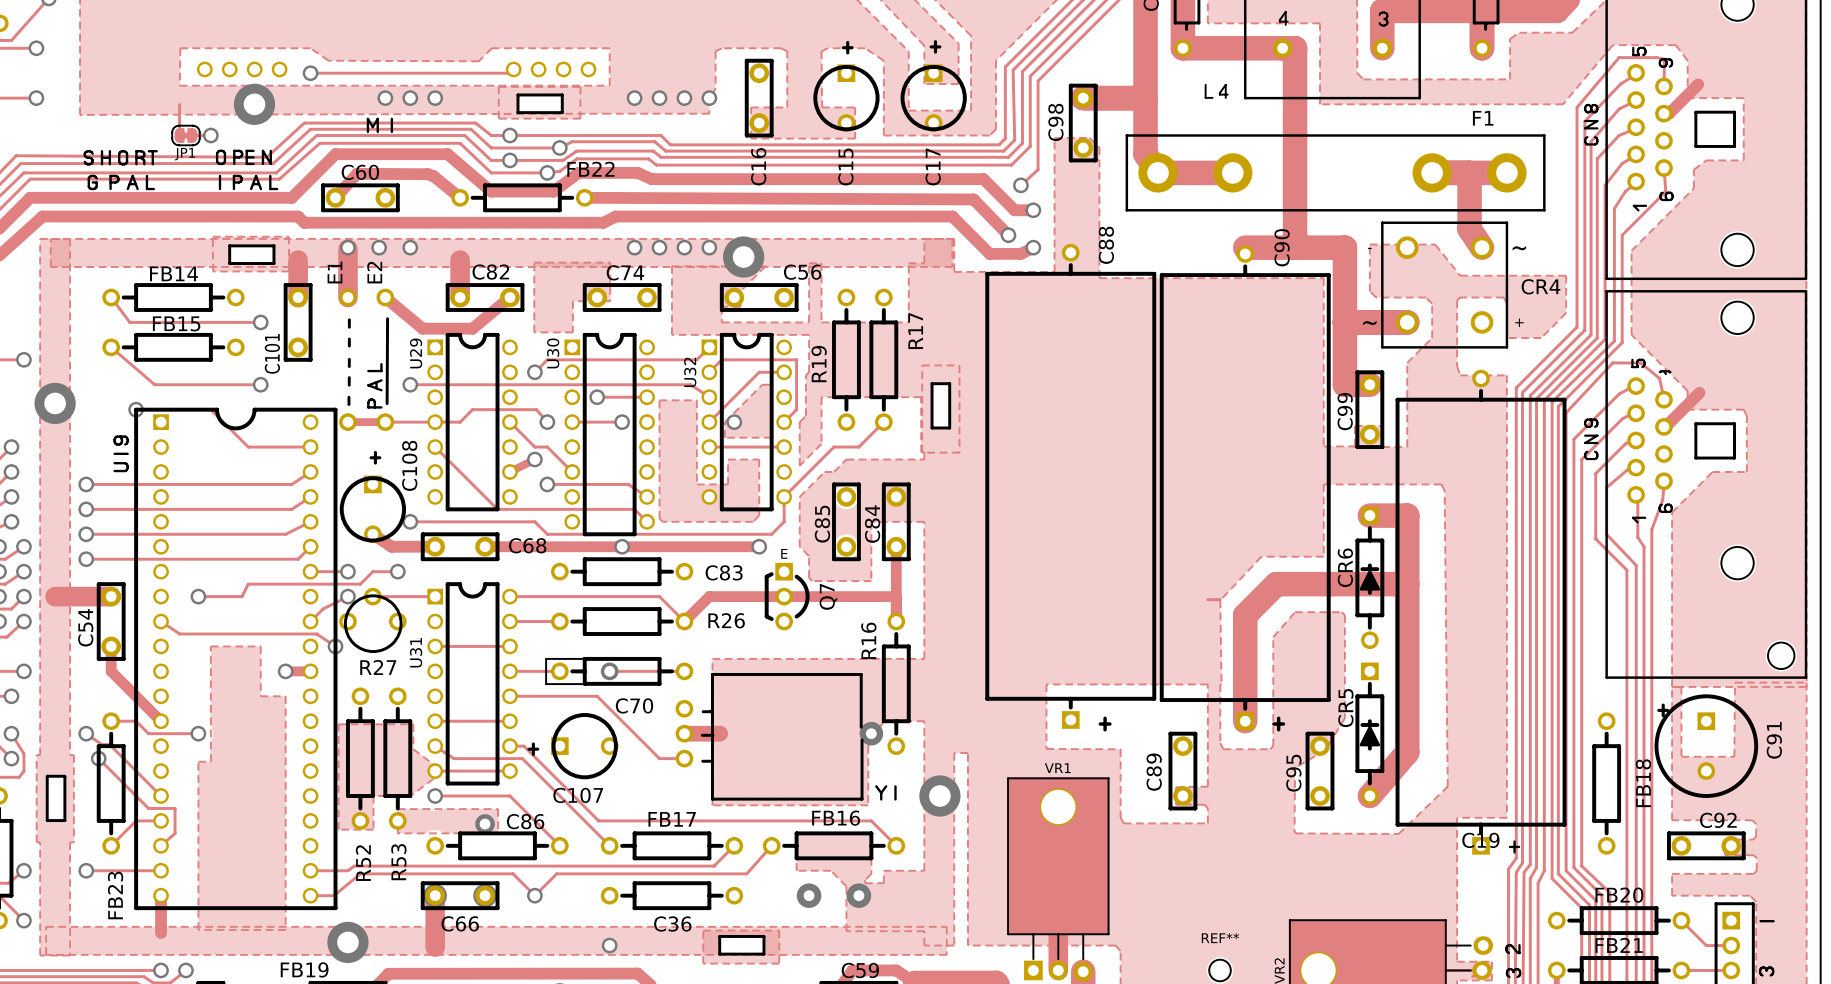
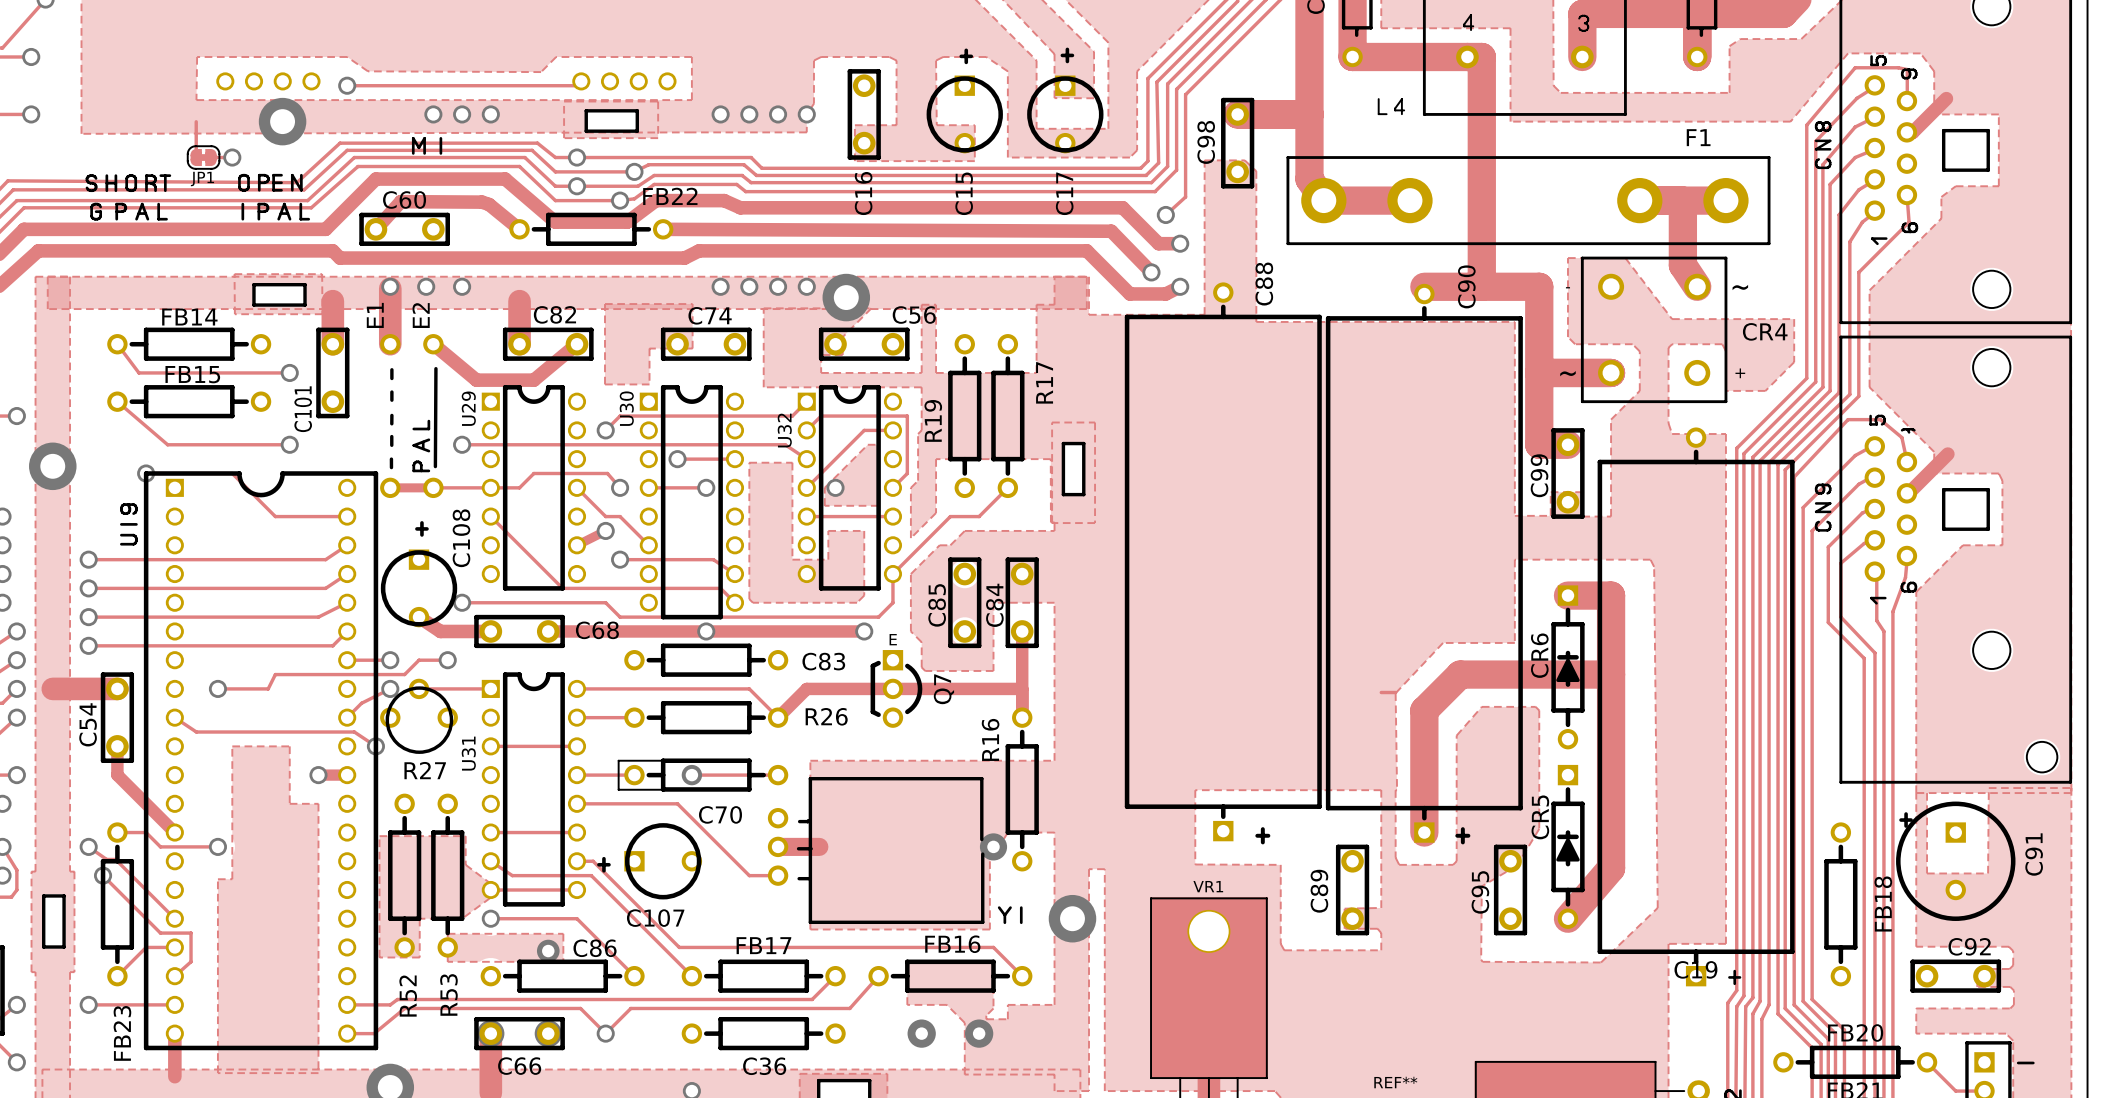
zone outline: (1369, 244) (1435, 244) (1460, 275) -> (1567, 283) (1567, 258) (1625, 258) (1672, 319)

